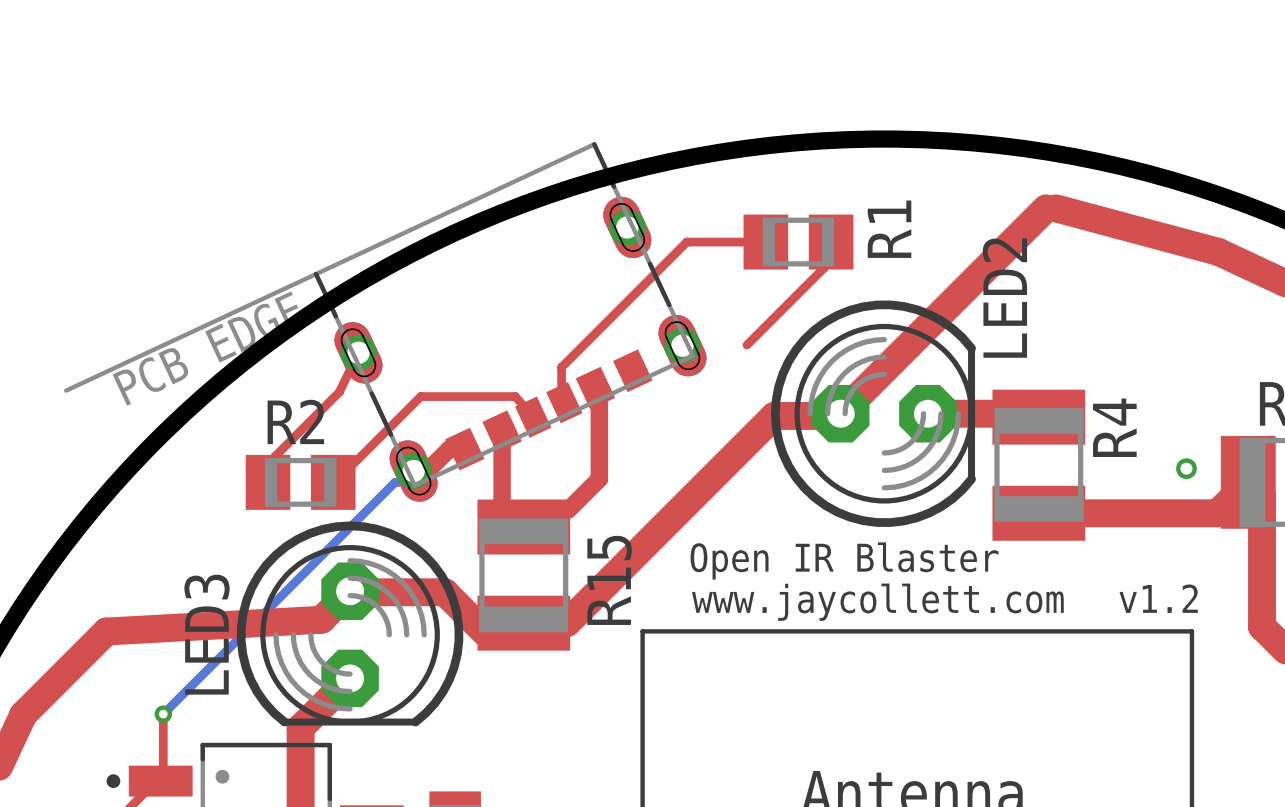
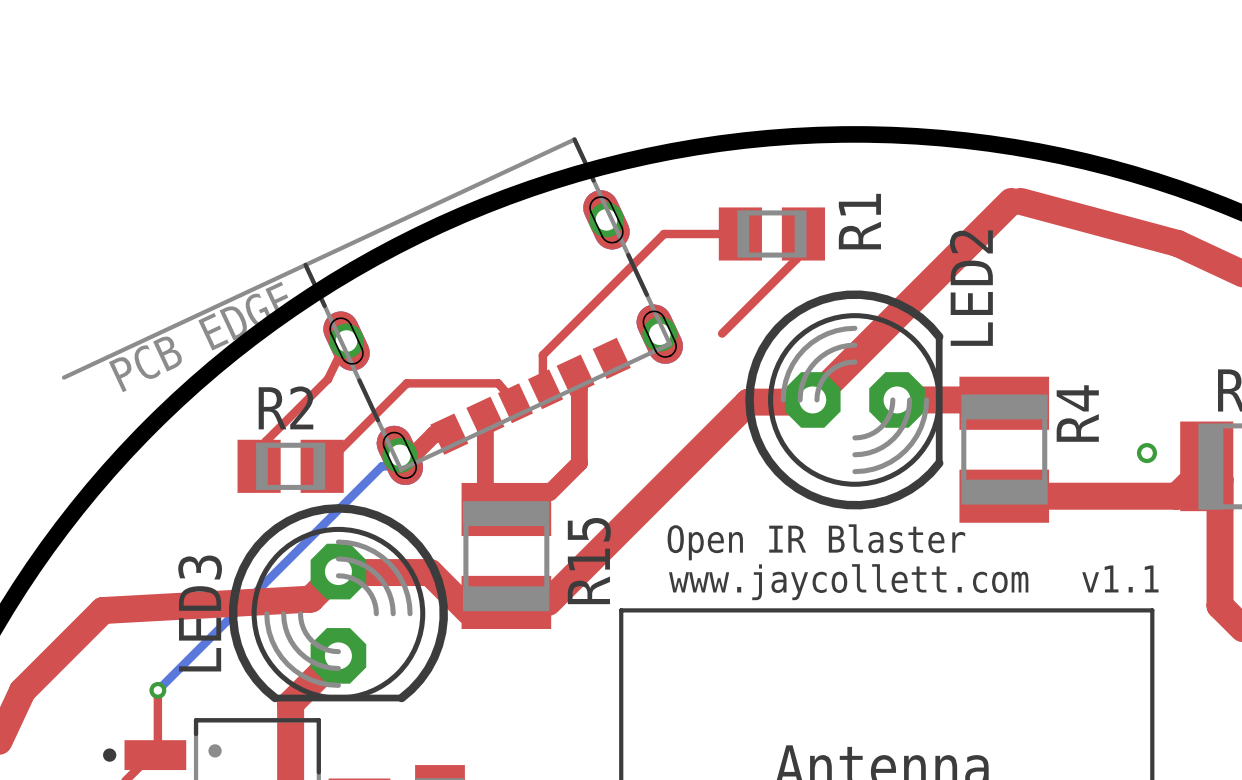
text: v1.2 (1158, 598) -> v1.1 (1120, 578)

